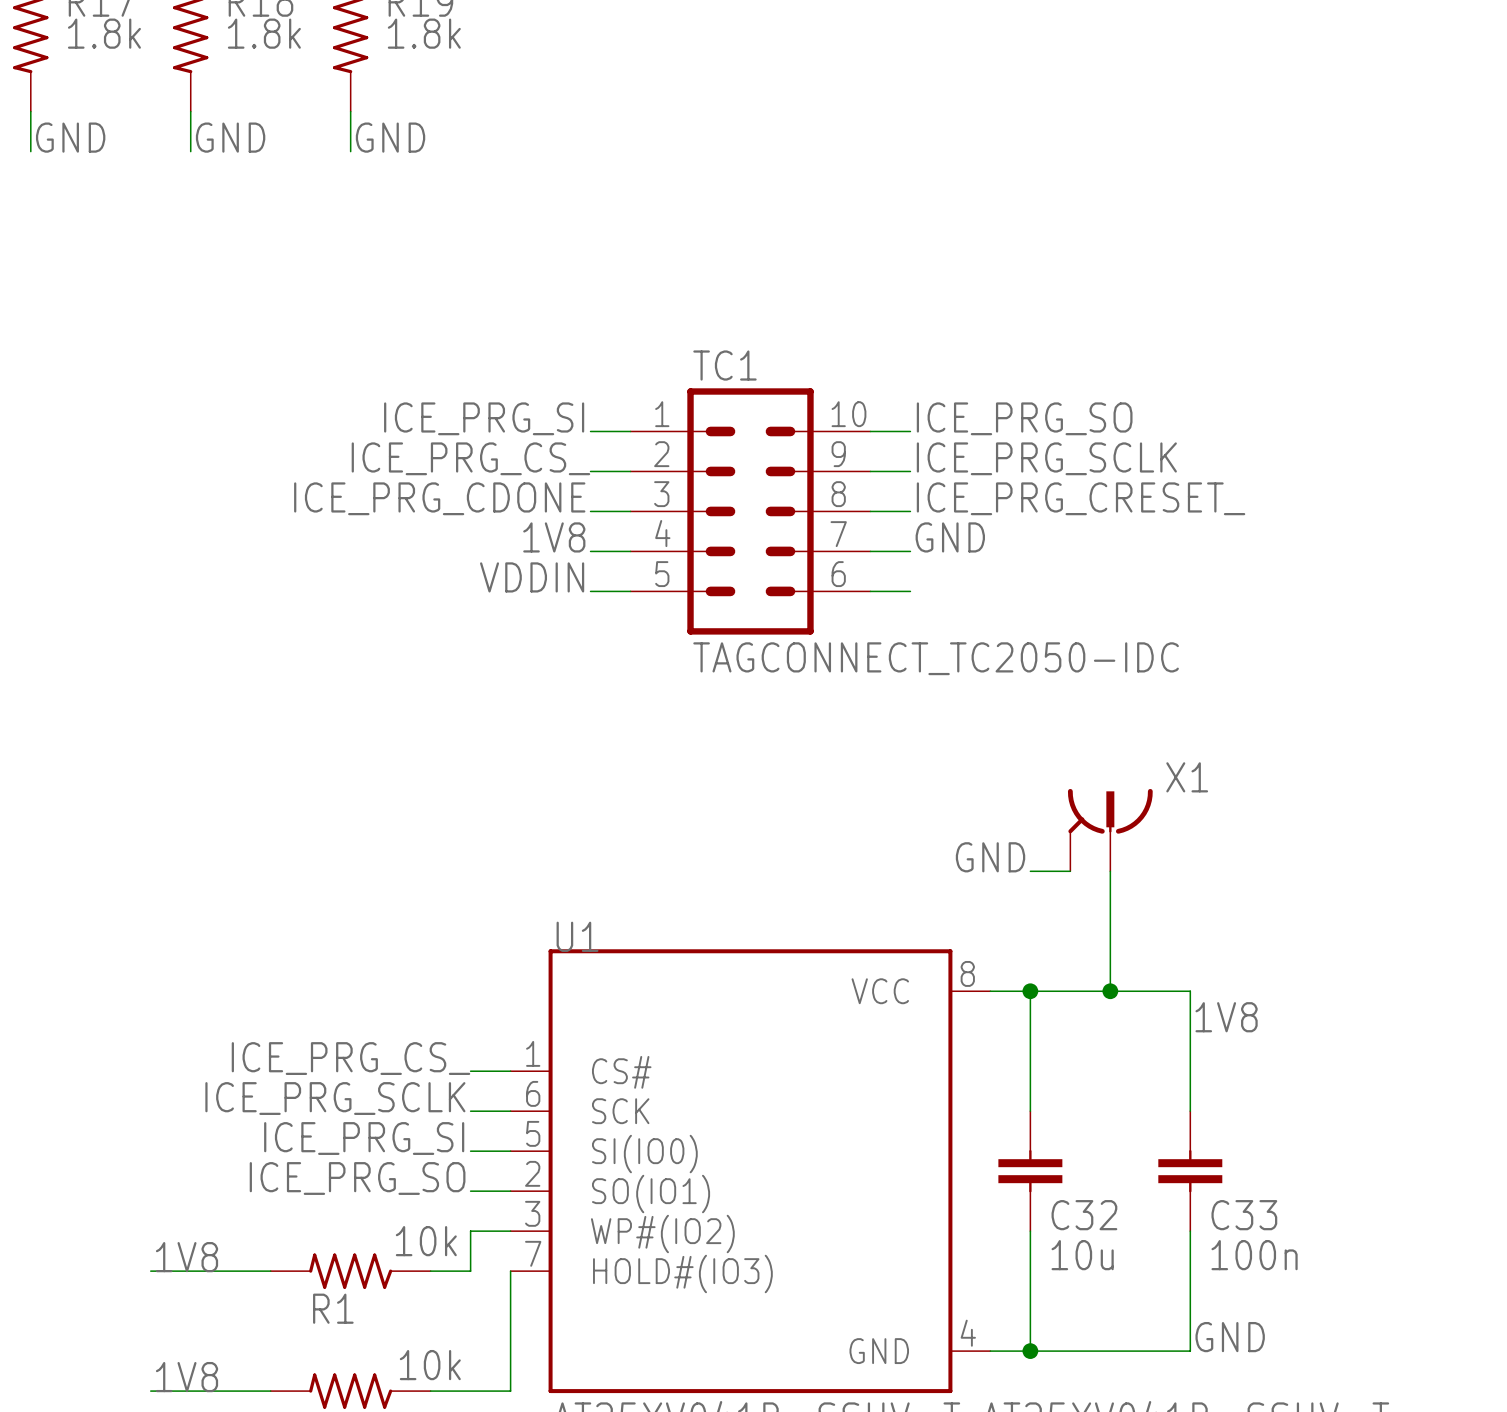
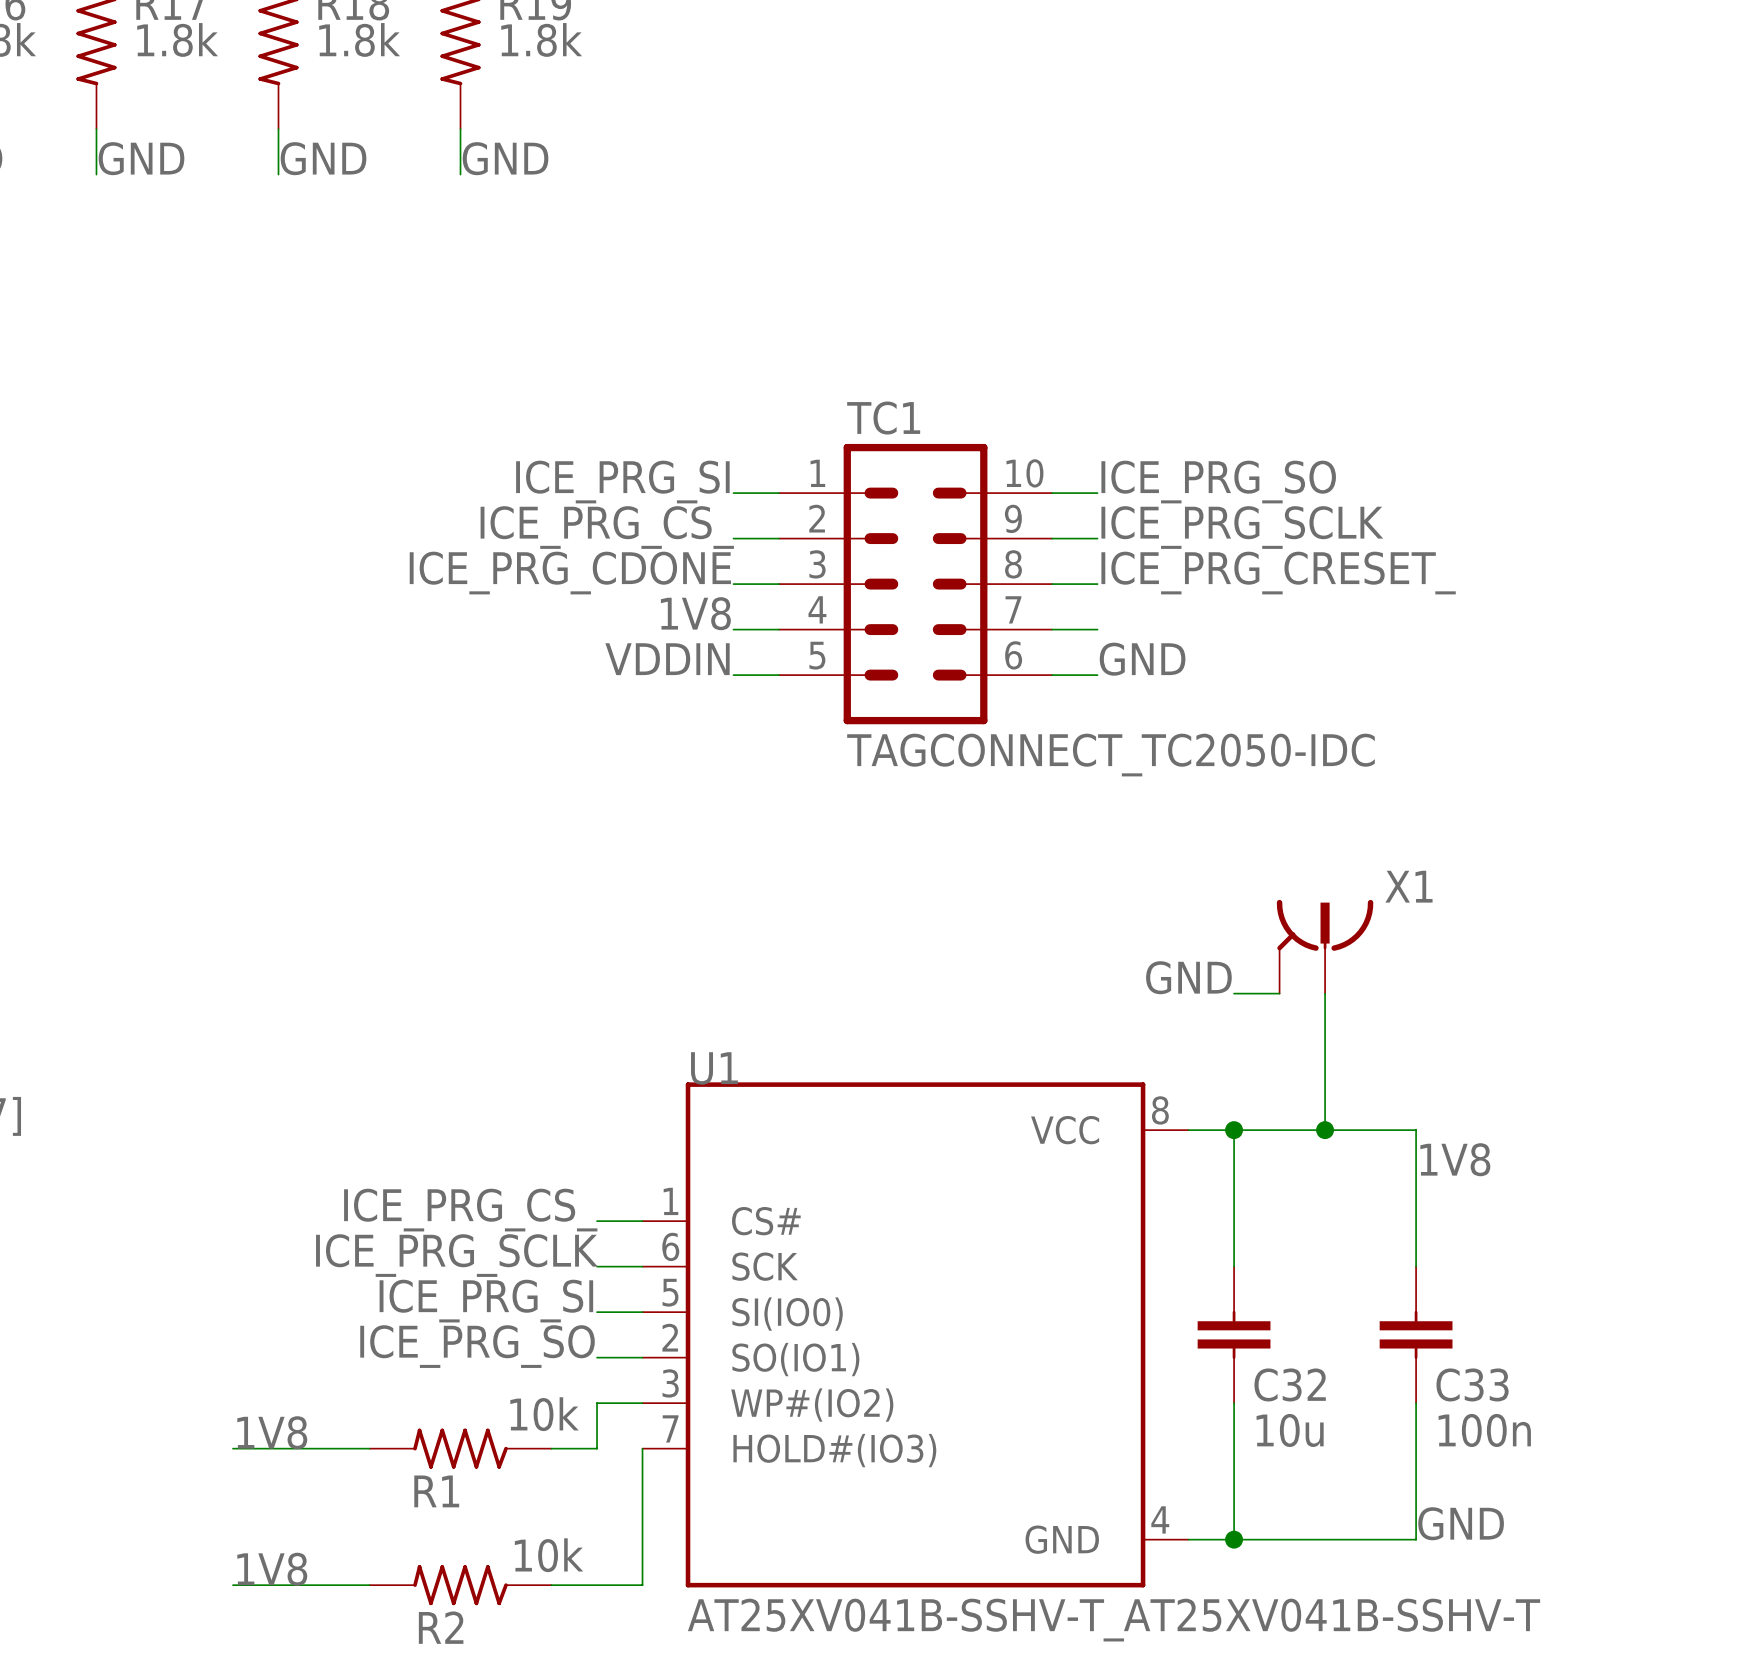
label position: GND (950, 537) -> GND (1142, 659)

